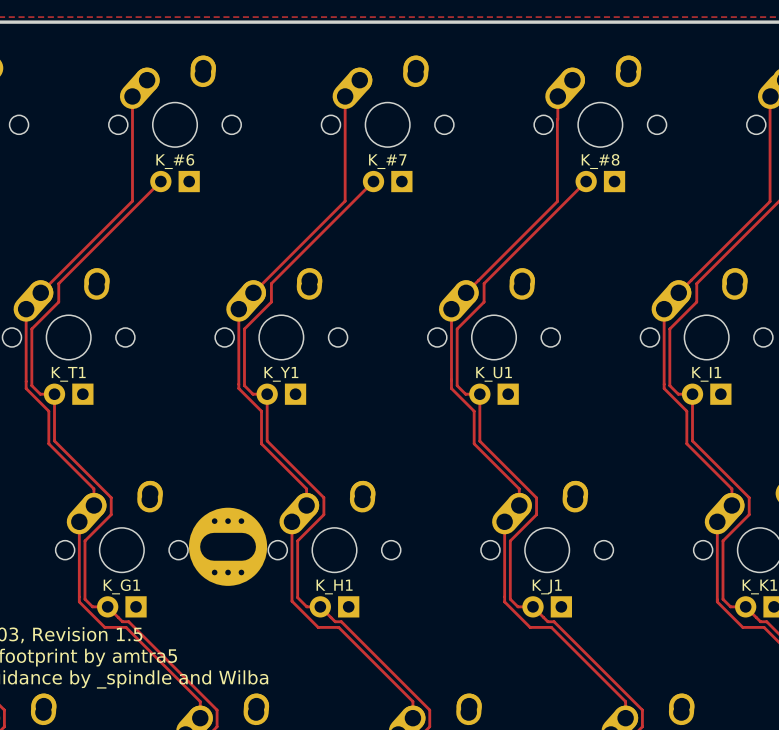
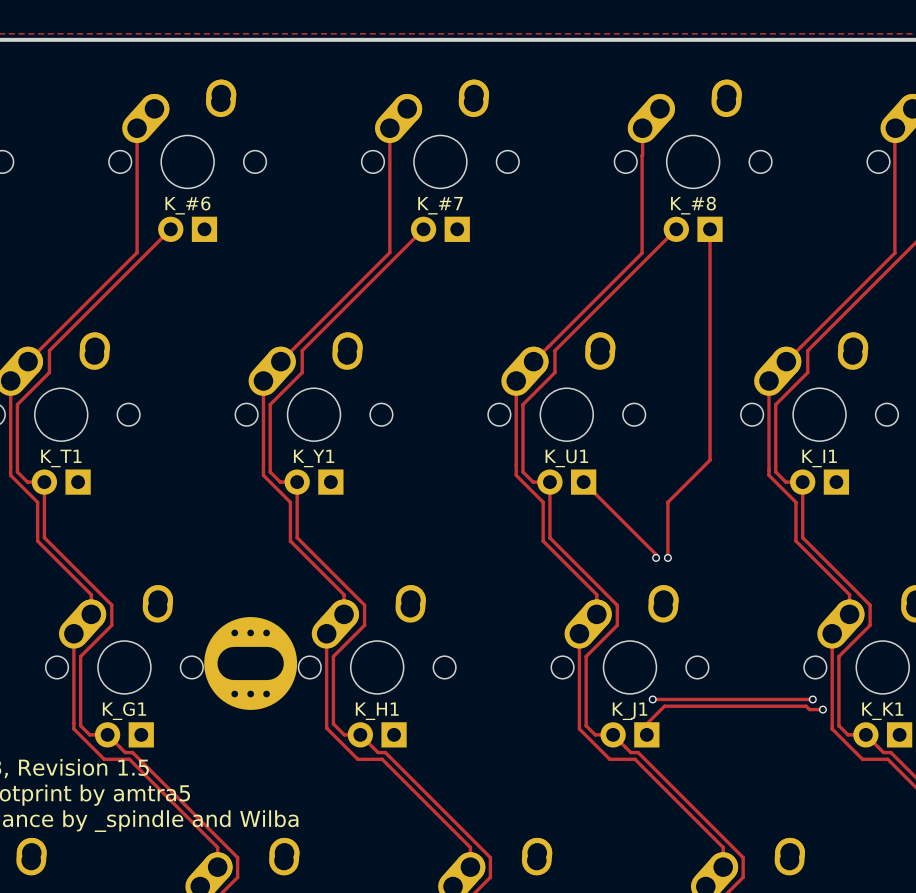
track: none -> (710, 229) (710, 460) (667, 502) (667, 557)
track: none -> (583, 482) (656, 554) (656, 557)
via: none -> (656, 557)
via: none -> (667, 557)
track: none -> (652, 699) (812, 699)
via: none -> (652, 699)
via: none -> (812, 699)
track: none -> (822, 709) (809, 709) (806, 706) (664, 706) (646, 723) (646, 734)
via: none -> (822, 709)

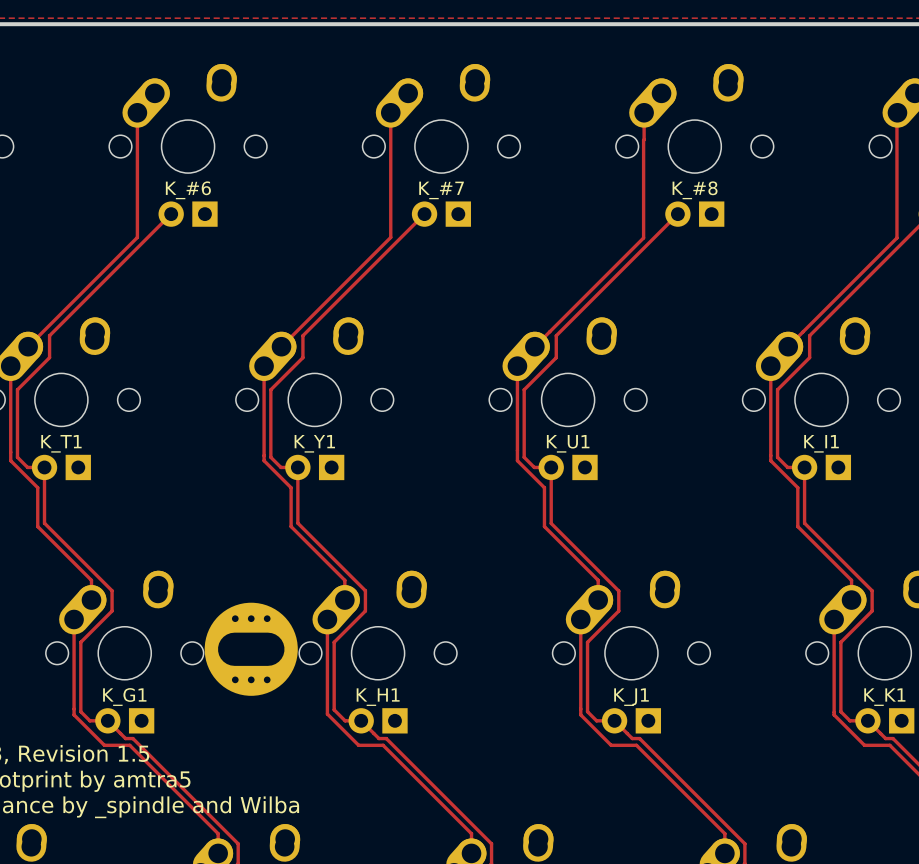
track: (710, 229) (710, 460) (667, 502) (667, 557) -> none
track: (583, 482) (656, 554) (656, 557) -> none
via: (656, 557) -> none
via: (667, 557) -> none
track: (652, 699) (812, 699) -> none
via: (652, 699) -> none
via: (812, 699) -> none
track: (822, 709) (809, 709) (806, 706) (664, 706) (646, 723) (646, 734) -> none
via: (822, 709) -> none

